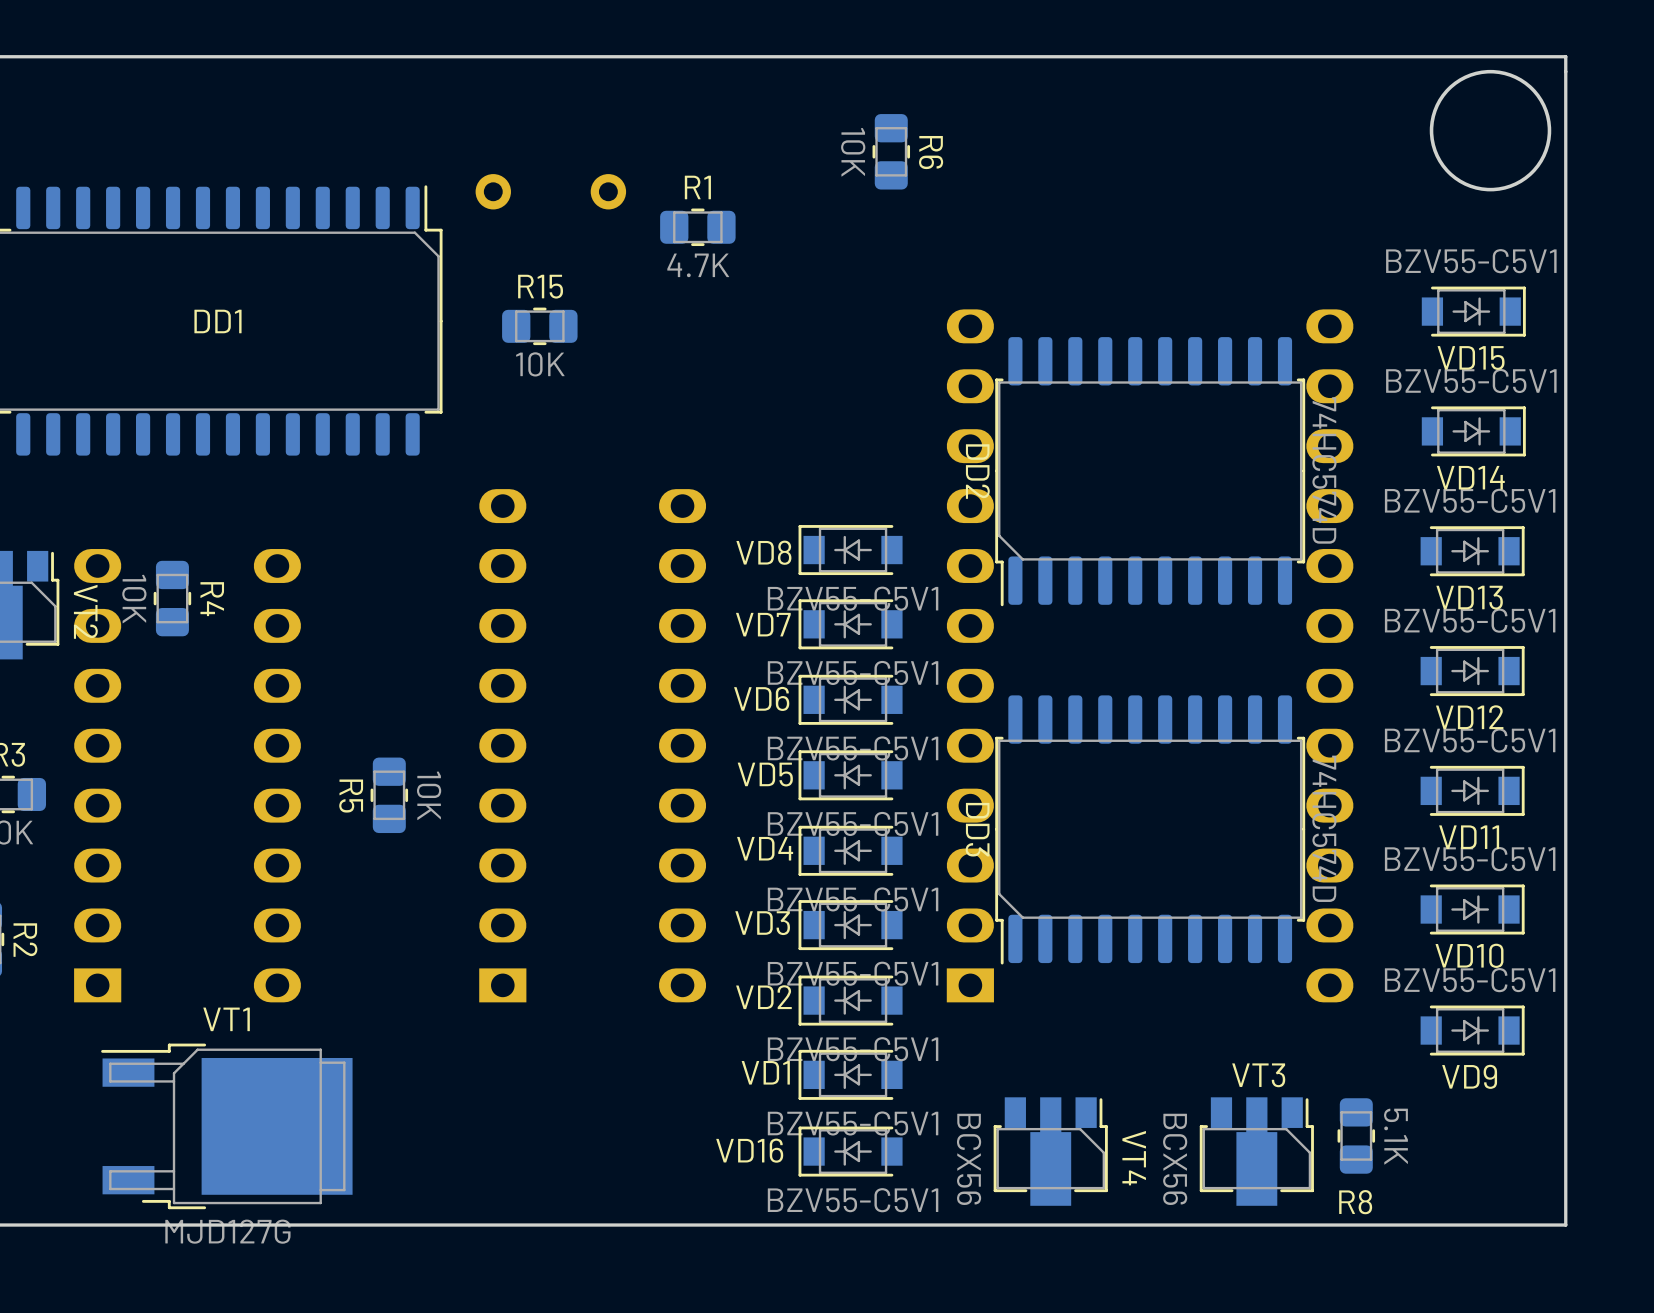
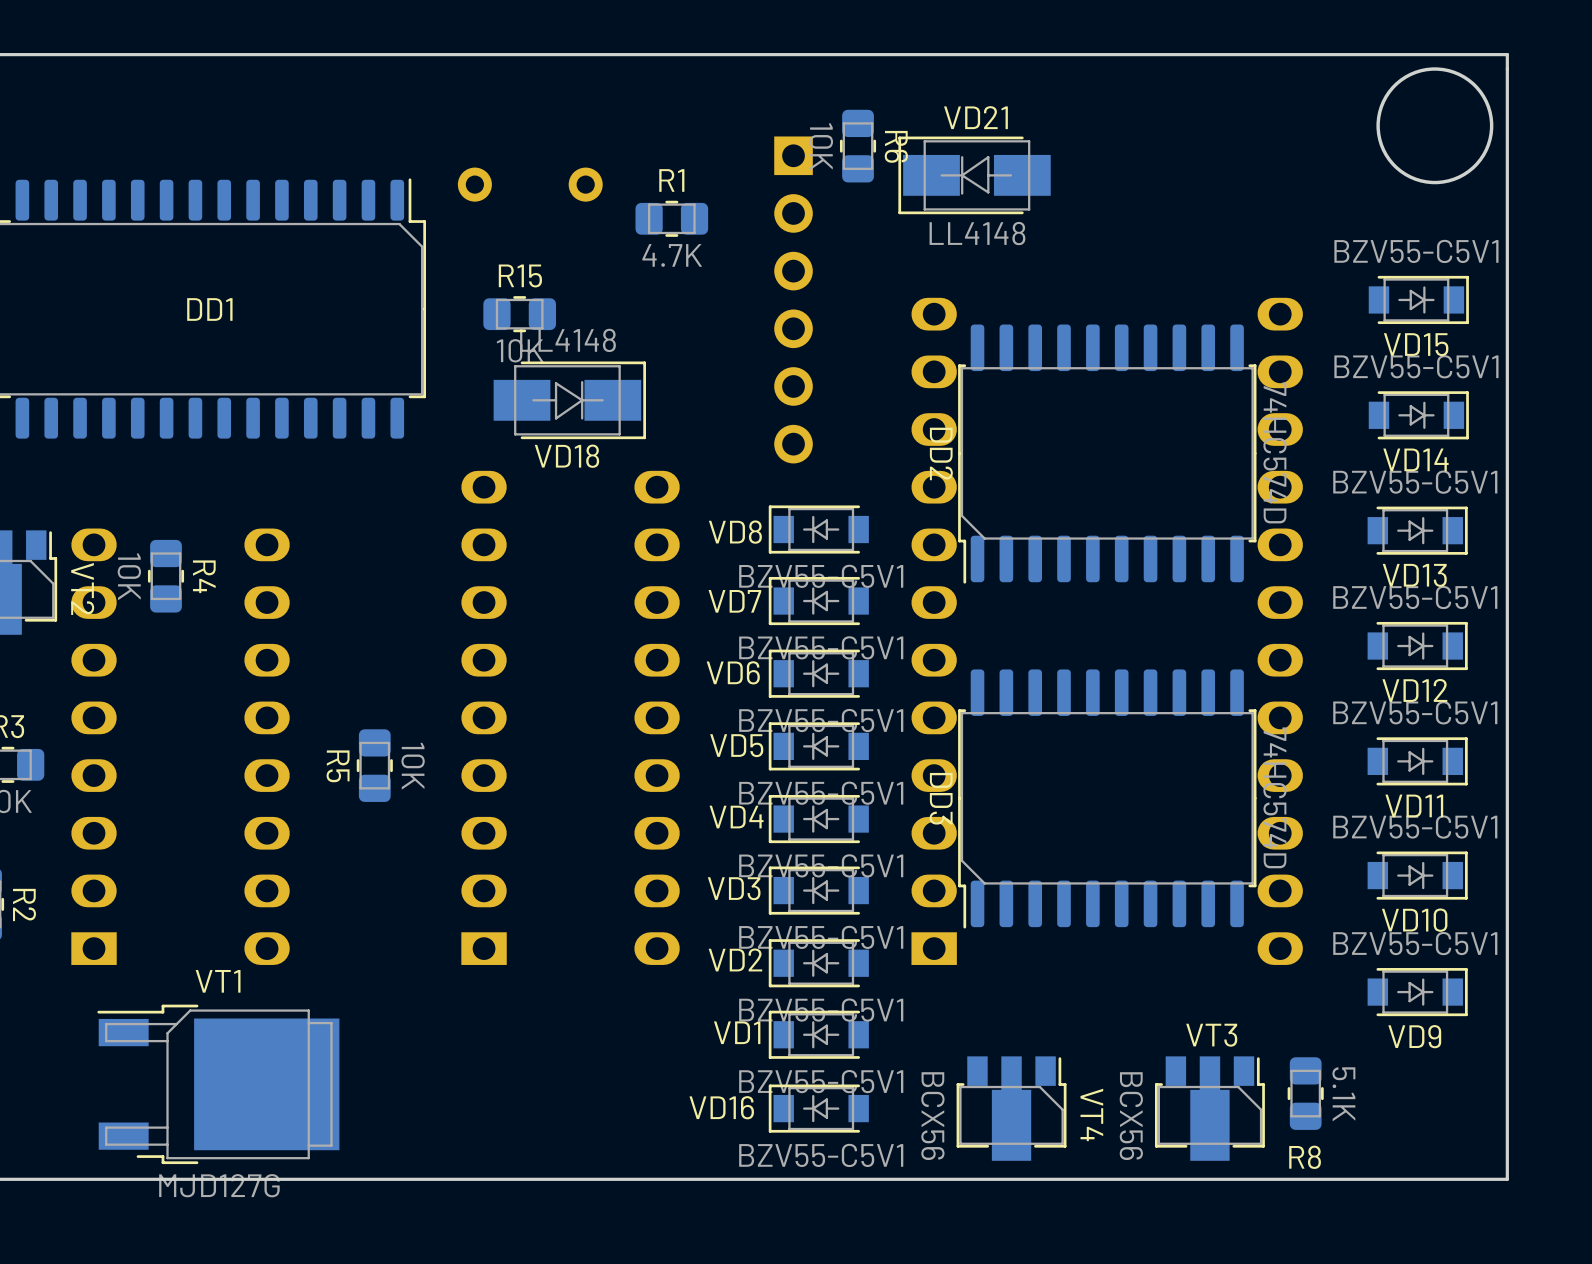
VD21: none -> LL4148 (974, 175)
part: none -> (793, 299)
VD18: none -> LL4148 (569, 400)

